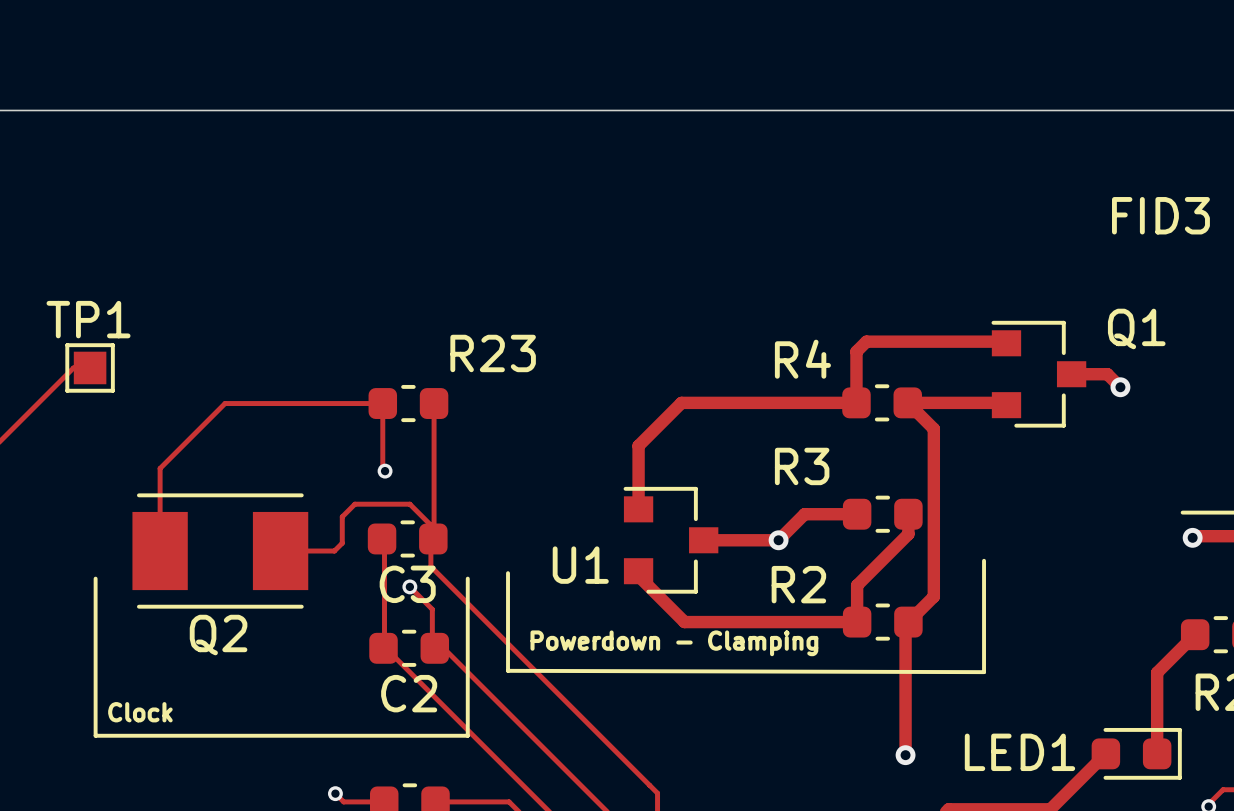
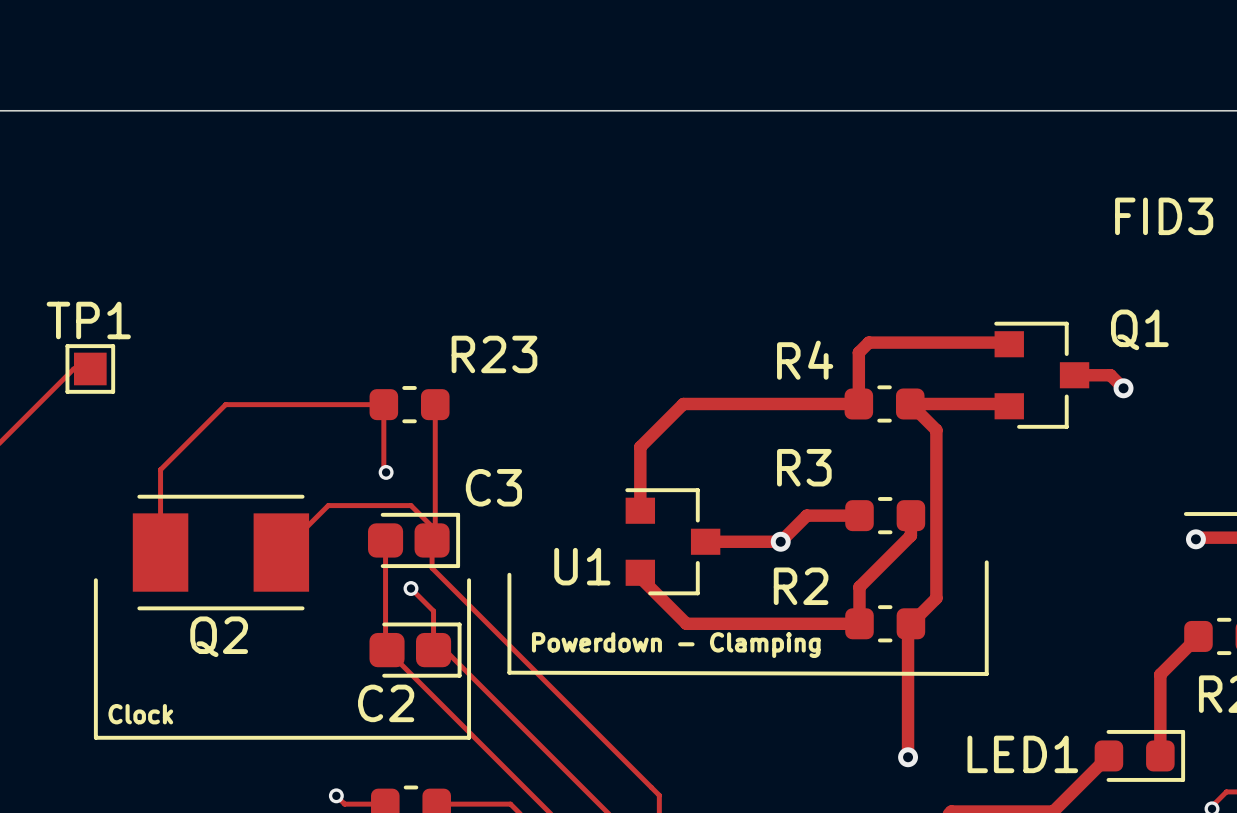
track: (354, 504) (342, 516) (342, 543) (334, 551) (280, 551) -> (355, 505) (328, 505) (281, 552)
C3 footprint: [367, 520, 448, 558] -> [368, 512, 461, 569]
C3 name position: C3 (407, 584) -> C3 (493, 487)
C2 footprint: [369, 629, 450, 667] -> [369, 622, 462, 678]

